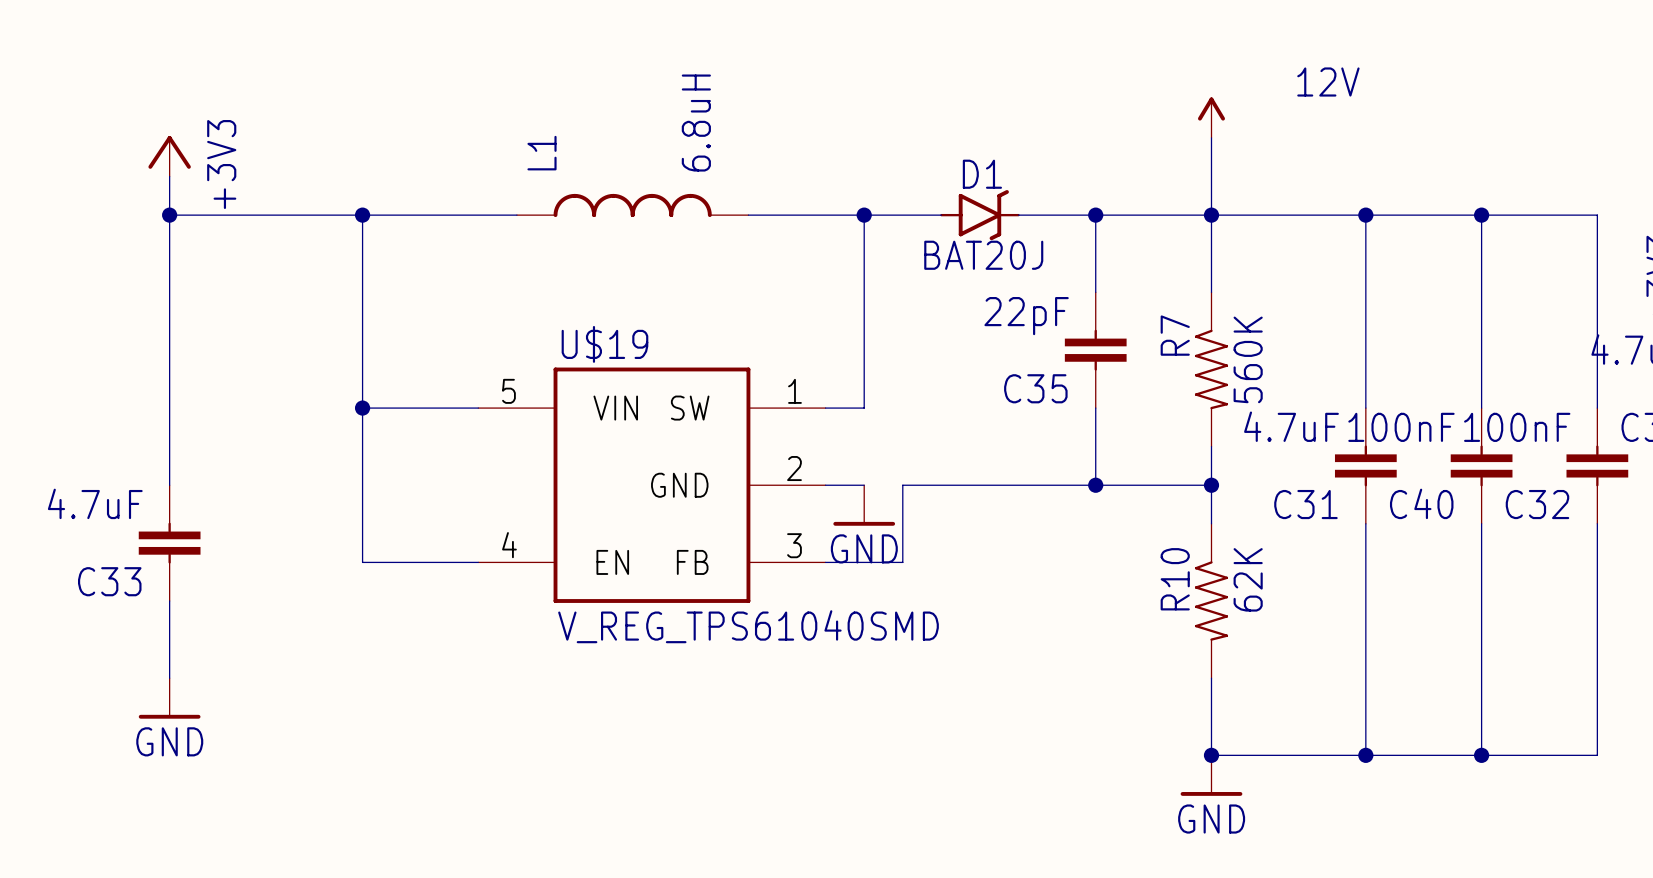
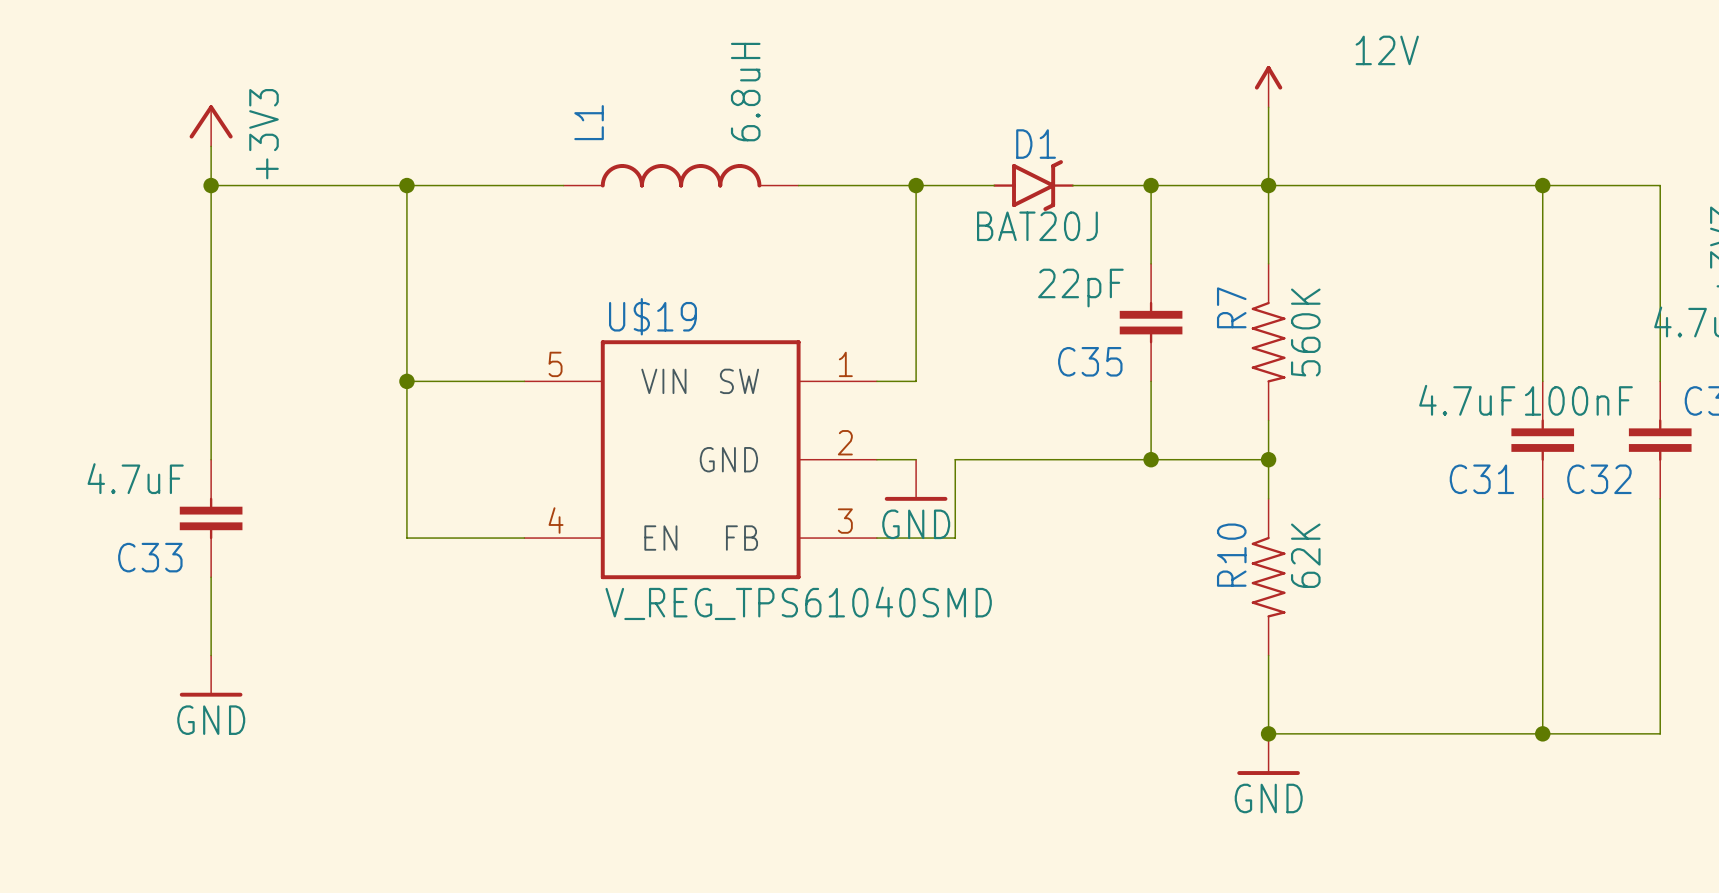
wire: (1365, 215) (1365, 408) -> none
junction: (1365, 215) -> none
C40 value: 100nF (1401, 427) -> 4.7uF (1467, 400)
C31: 4.7uF (1365, 465) -> none
C40 name: C40 (1421, 503) -> C31 (1481, 479)
wire: (1365, 523) (1365, 755) -> none
junction: (1365, 755) -> none

